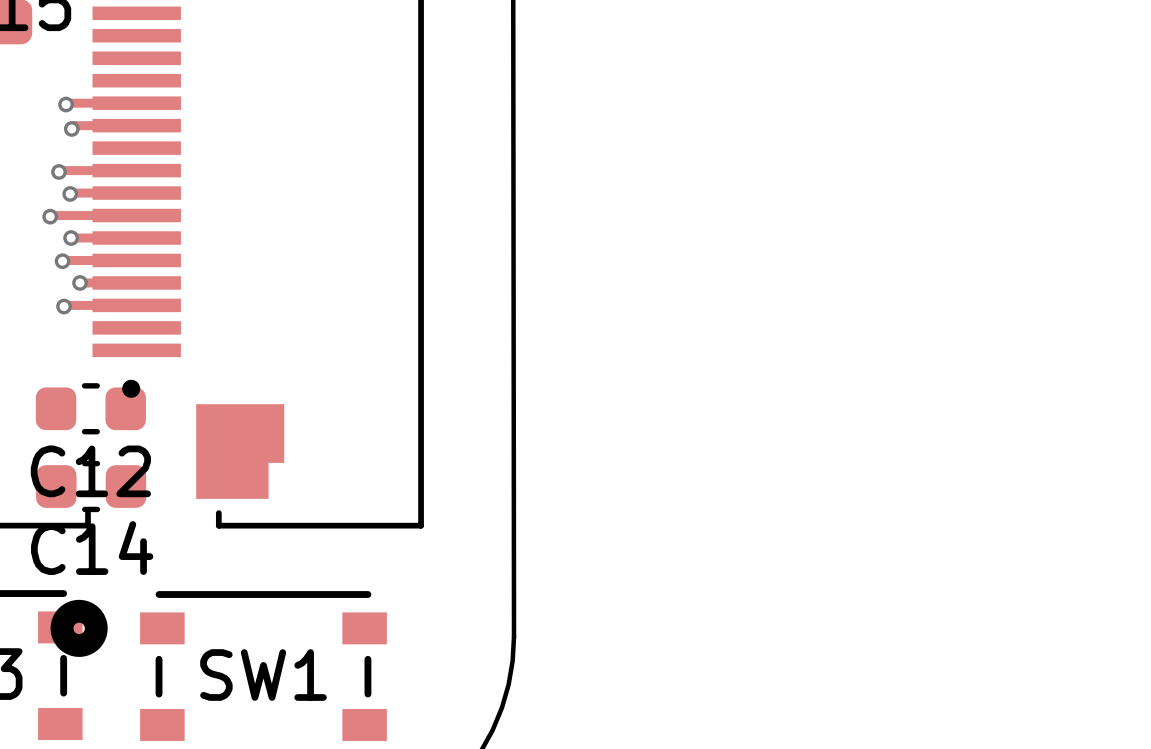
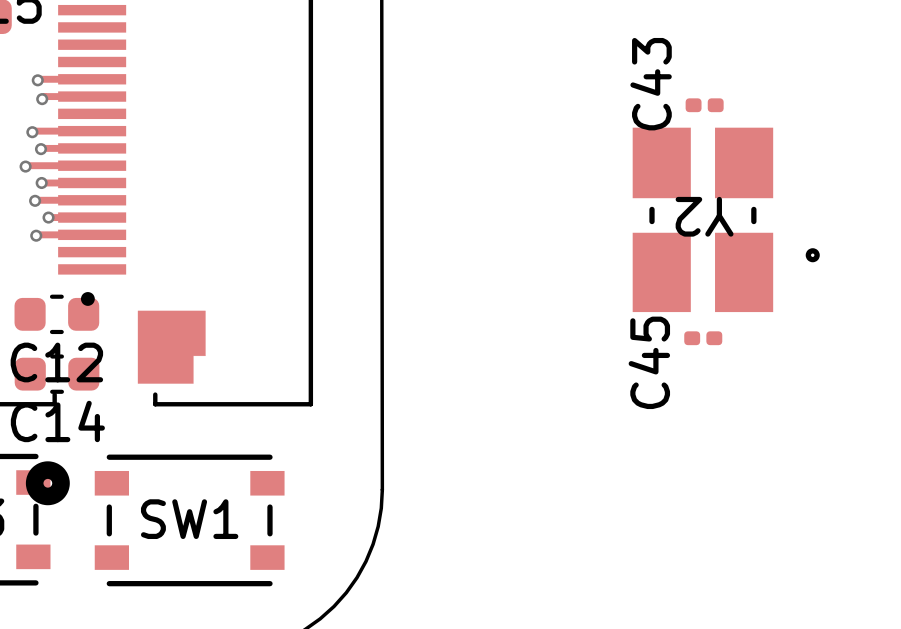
C43: none -> (704, 105)
Y2: none -> (726, 219)
C45: none -> (703, 338)

